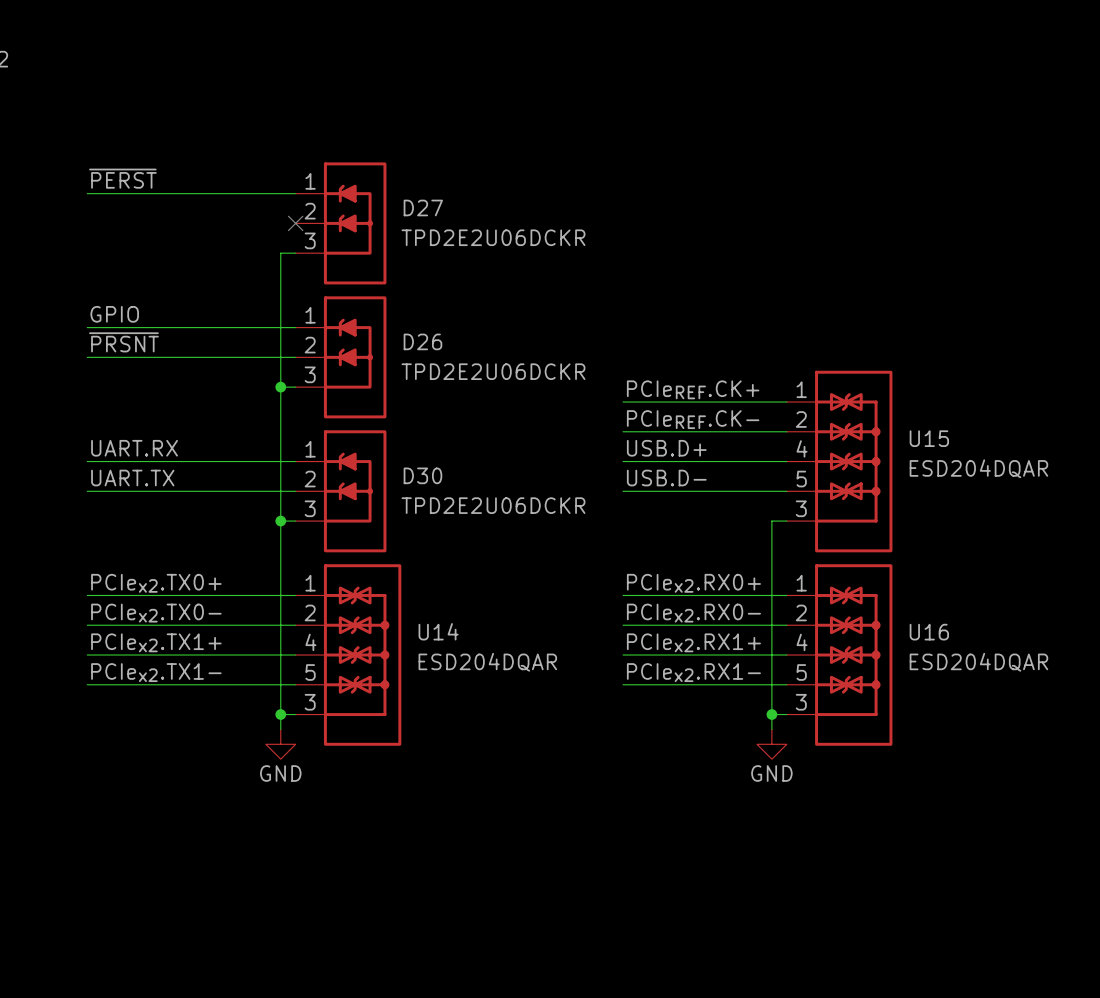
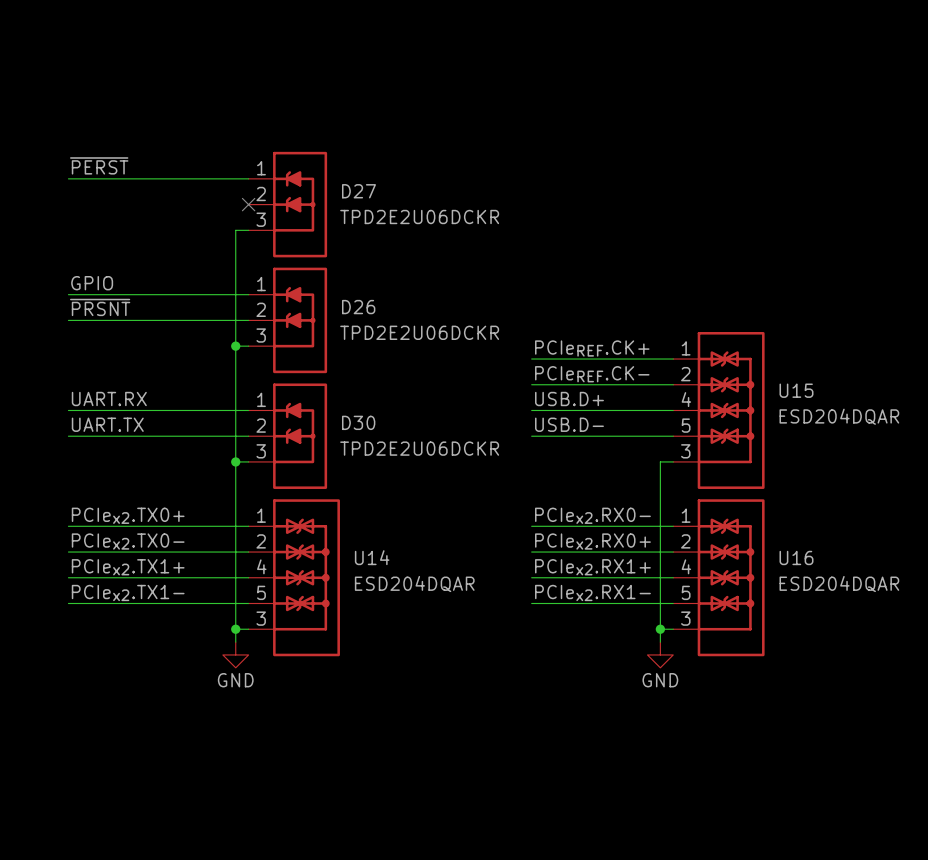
label: PCIex2.RX0+ (693, 583) -> PCIex2.RX0- (592, 515)
label: PCIex2.RX0- (693, 613) -> PCIex2.RX0+ (592, 541)

